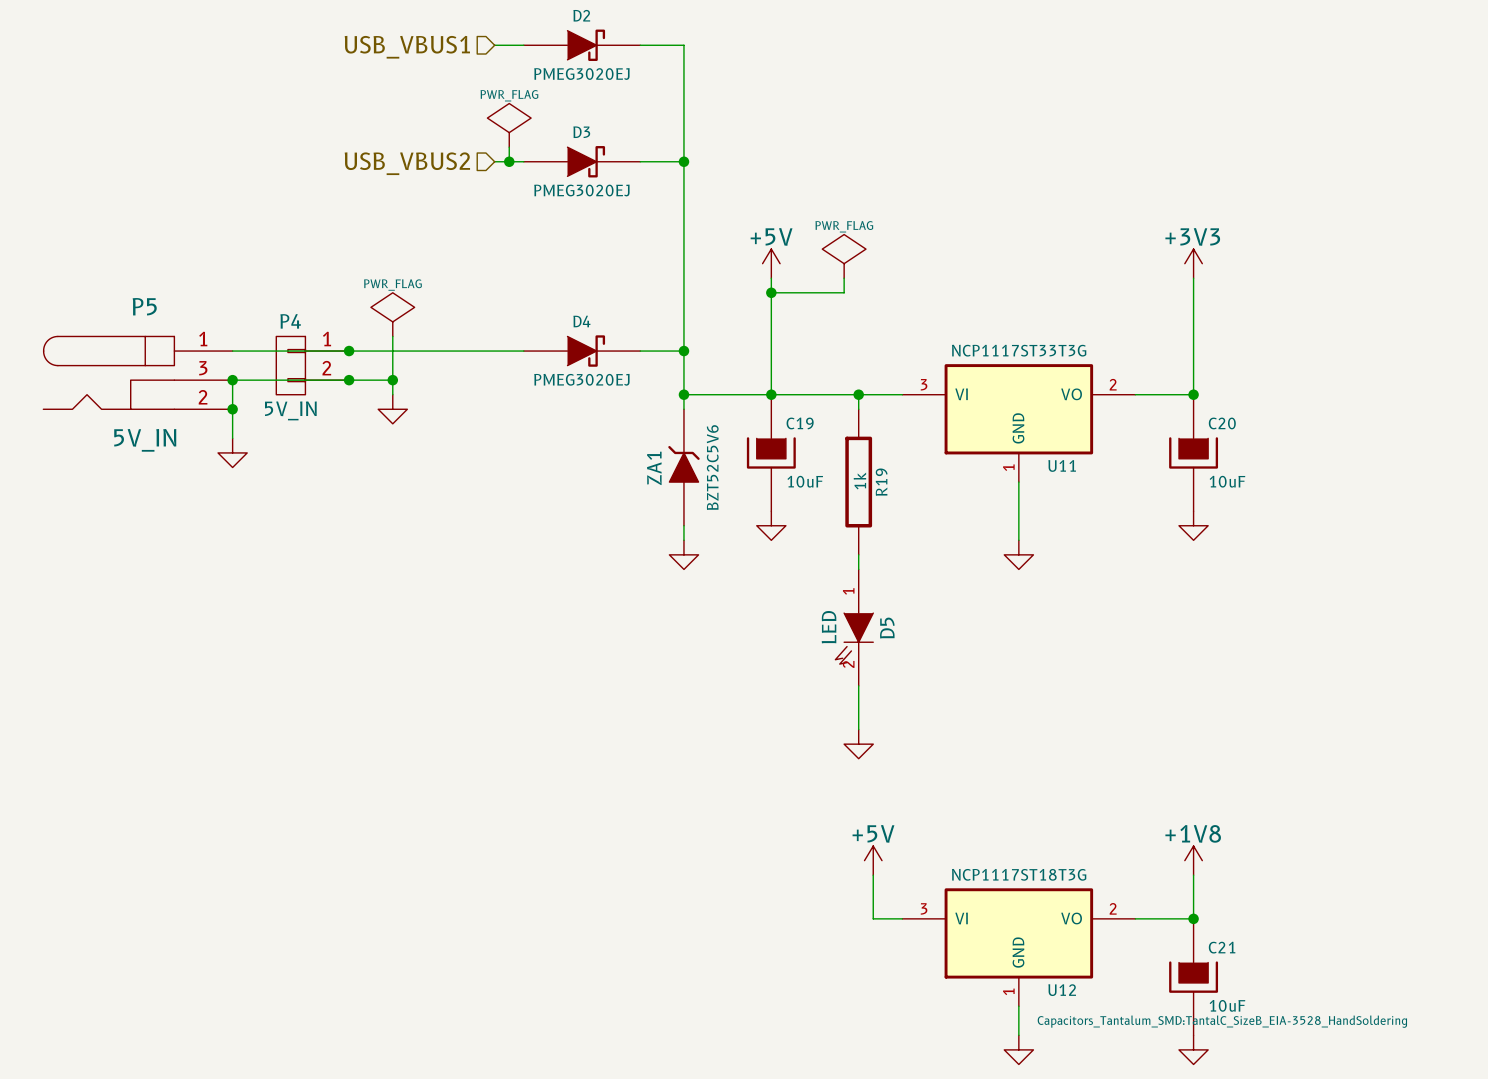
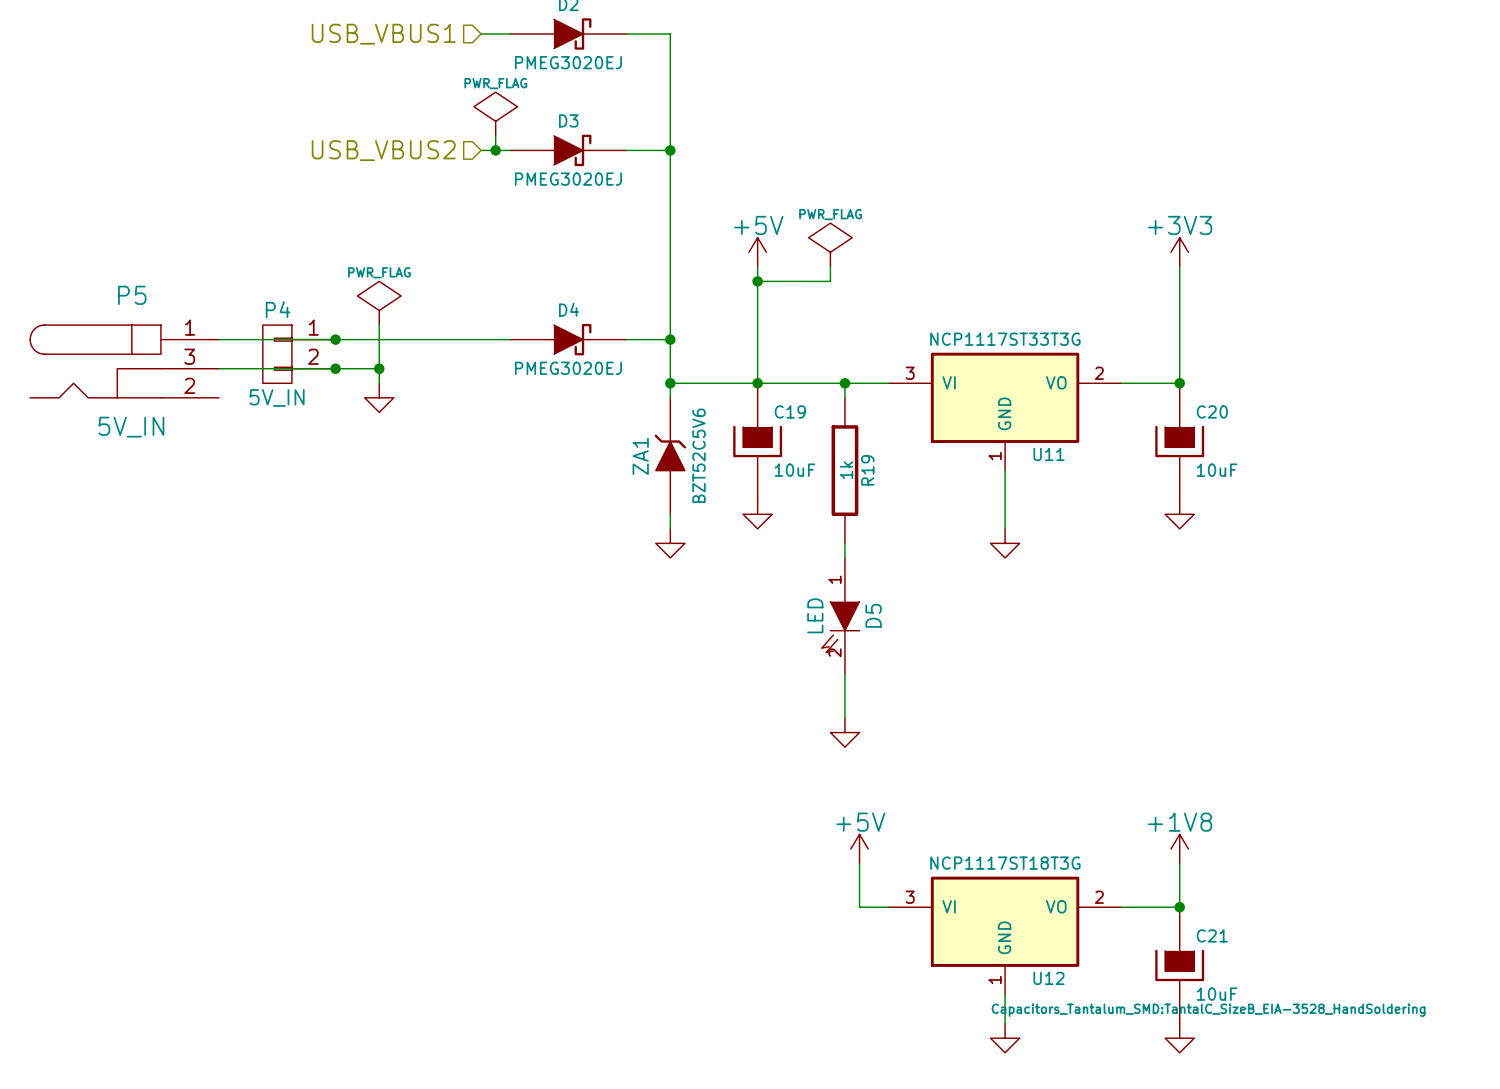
wire: (232, 380) (232, 438) -> none
junction: (232, 380) -> none
junction: (232, 409) -> none
power symbol: (232, 452) -> none

